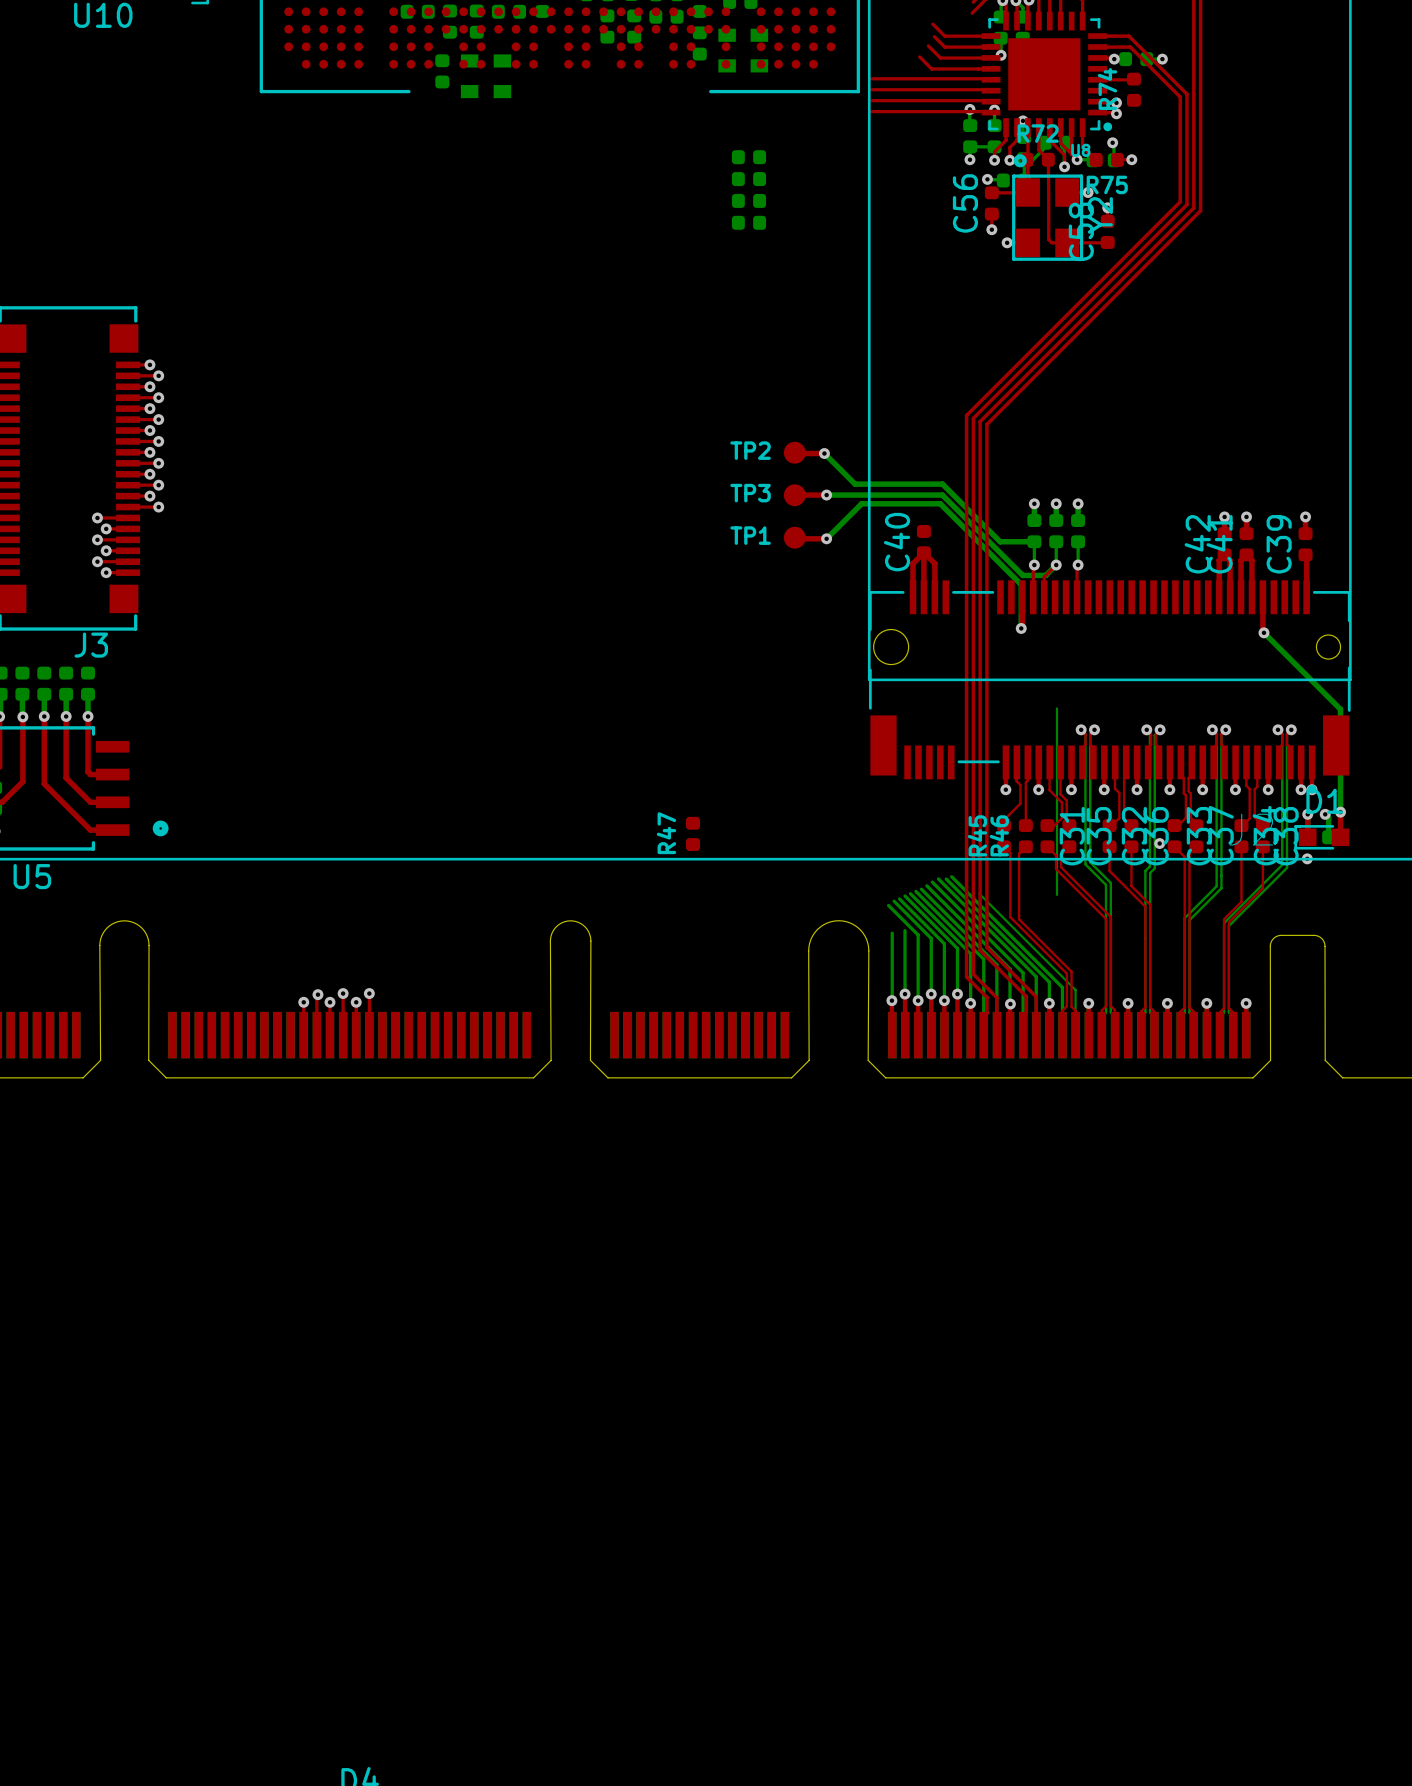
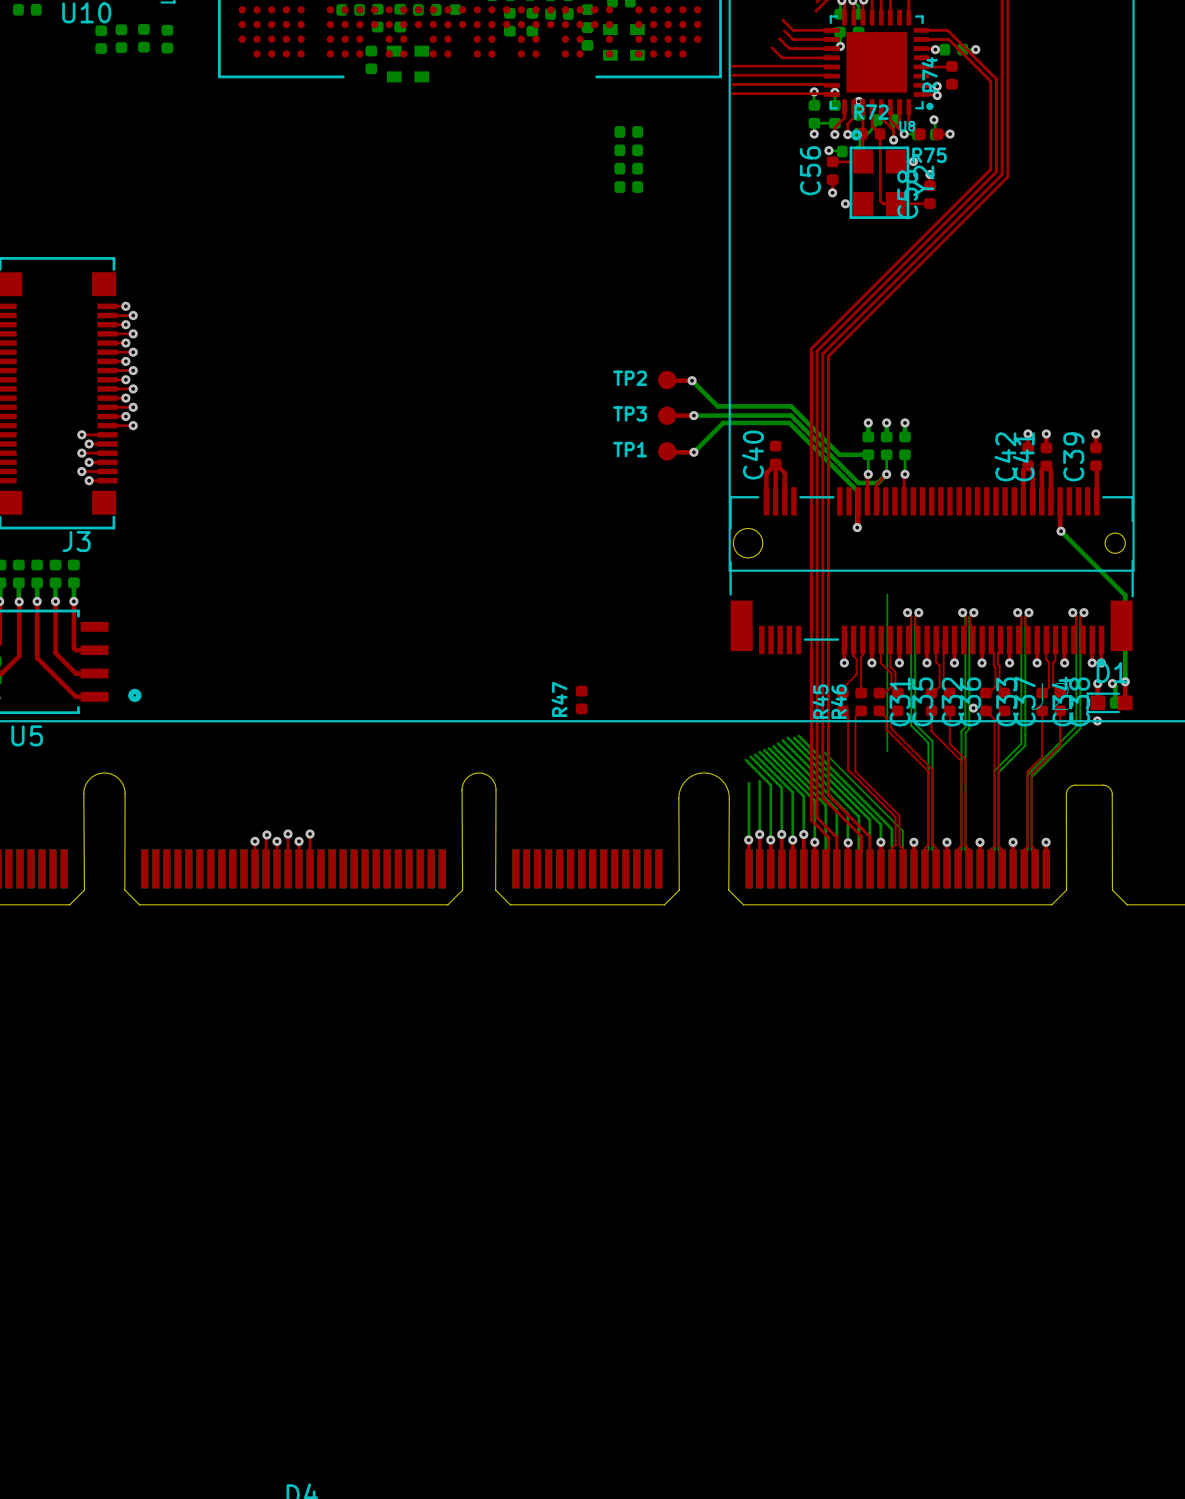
part: none -> (27, 9)
part: none -> (143, 38)
part: none -> (121, 38)
part: none -> (167, 39)
part: none -> (101, 39)

